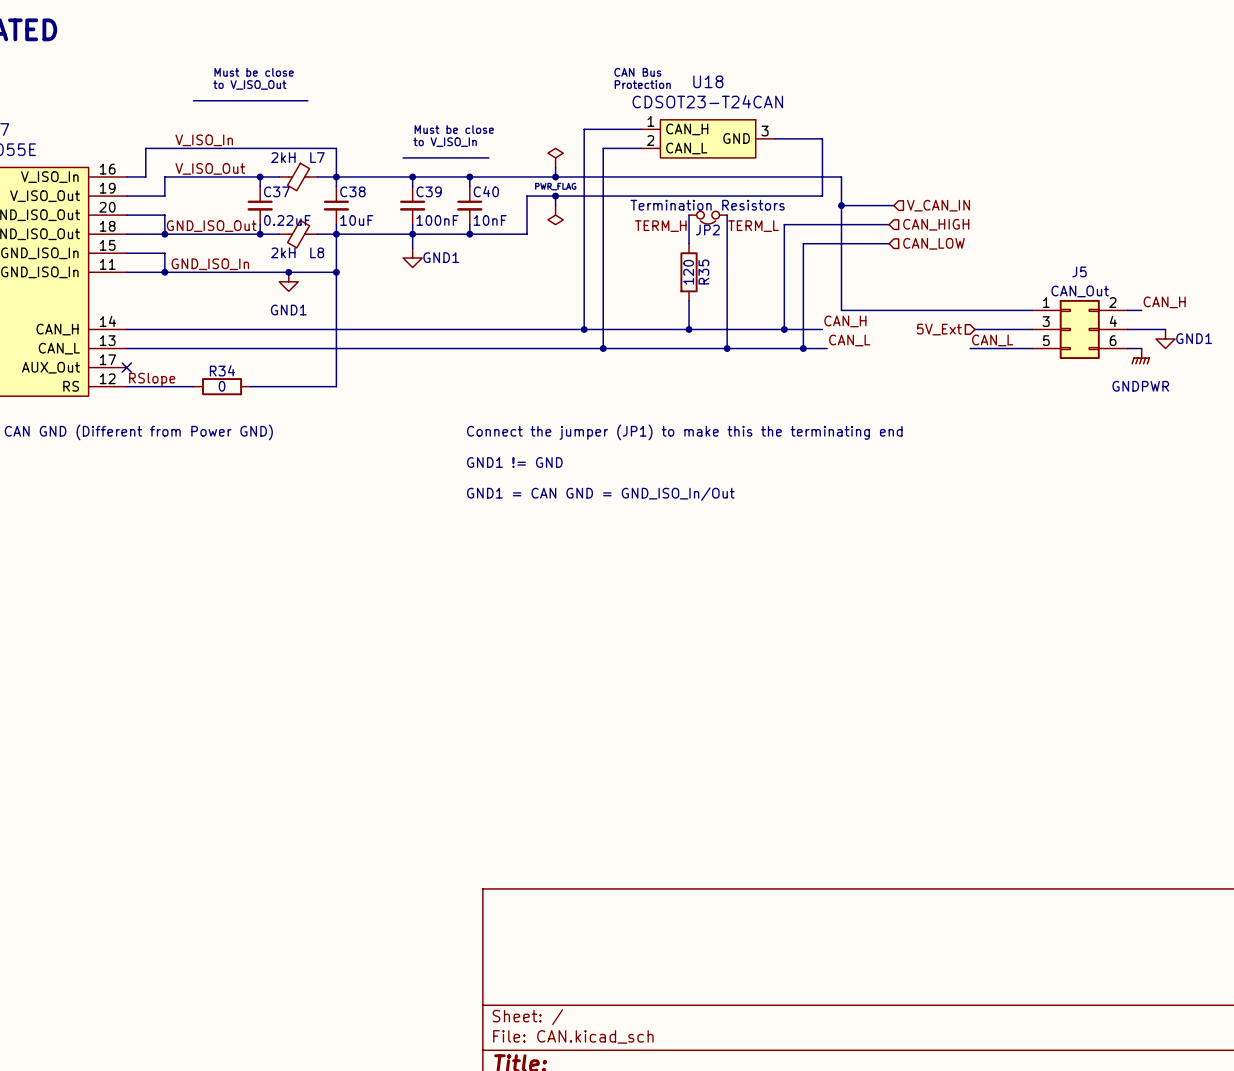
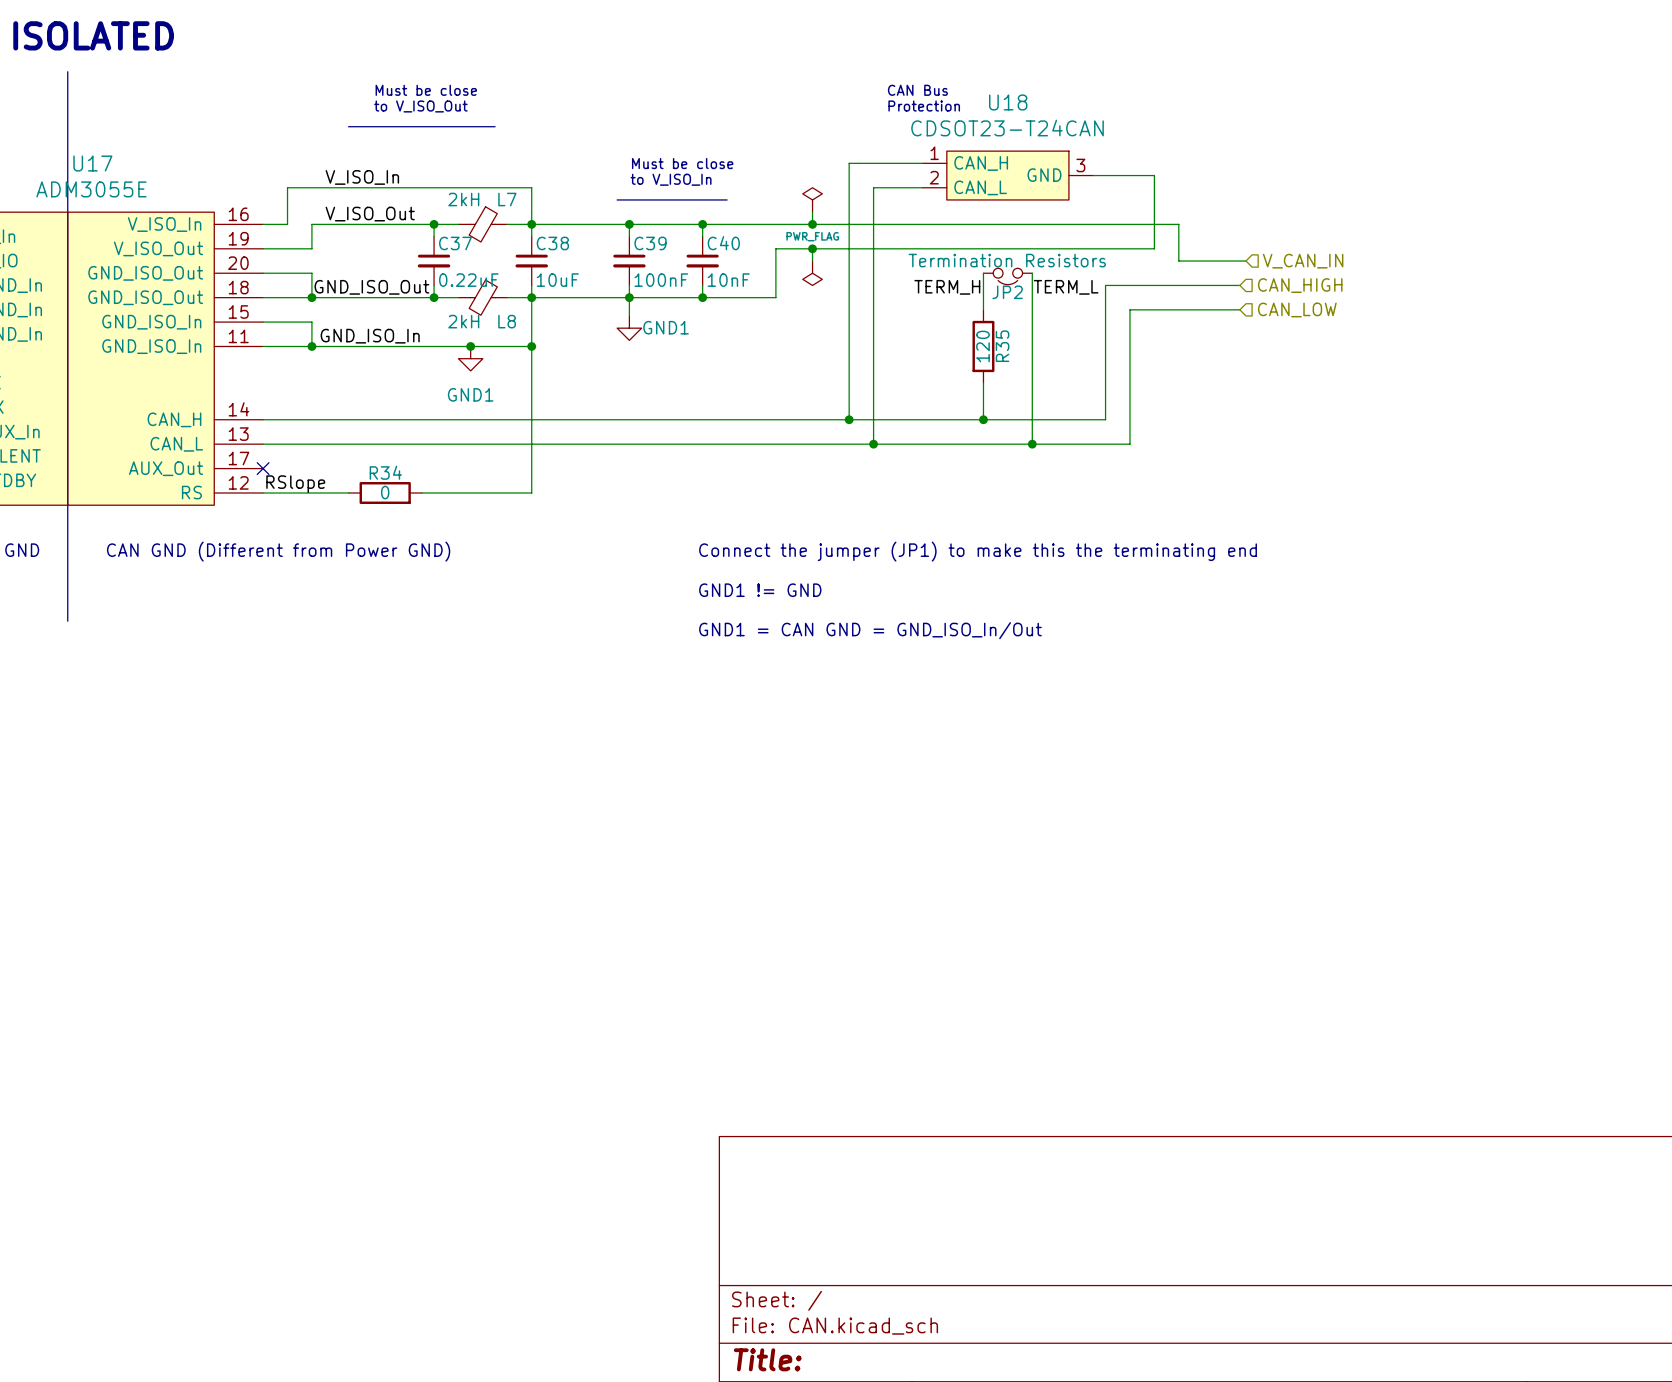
wire: (841, 205) (841, 310) (1032, 310) -> none
junction: (841, 205) -> none
label: CAN_H (1164, 302) -> none
wire: (1127, 310) (1141, 310) -> none
label: CAN_H (845, 321) -> none
wire: (784, 329) (822, 329) -> none
junction: (784, 329) -> none
hierarchical label: 5V_Ext (939, 329) -> none
wire: (974, 329) (1032, 329) -> none
J5: CAN_Out (1079, 329) -> none
wire: (1127, 329) (1165, 329) -> none
power symbol: GND1 (1165, 339) -> none
label: CAN_L (849, 340) -> none
label: CAN_L (992, 340) -> none
wire: (803, 348) (827, 348) -> none
junction: (803, 348) -> none
wire: (970, 348) (1032, 348) -> none
wire: (1127, 348) (1141, 348) -> none
power symbol: GNDPWR (1140, 356) -> none

